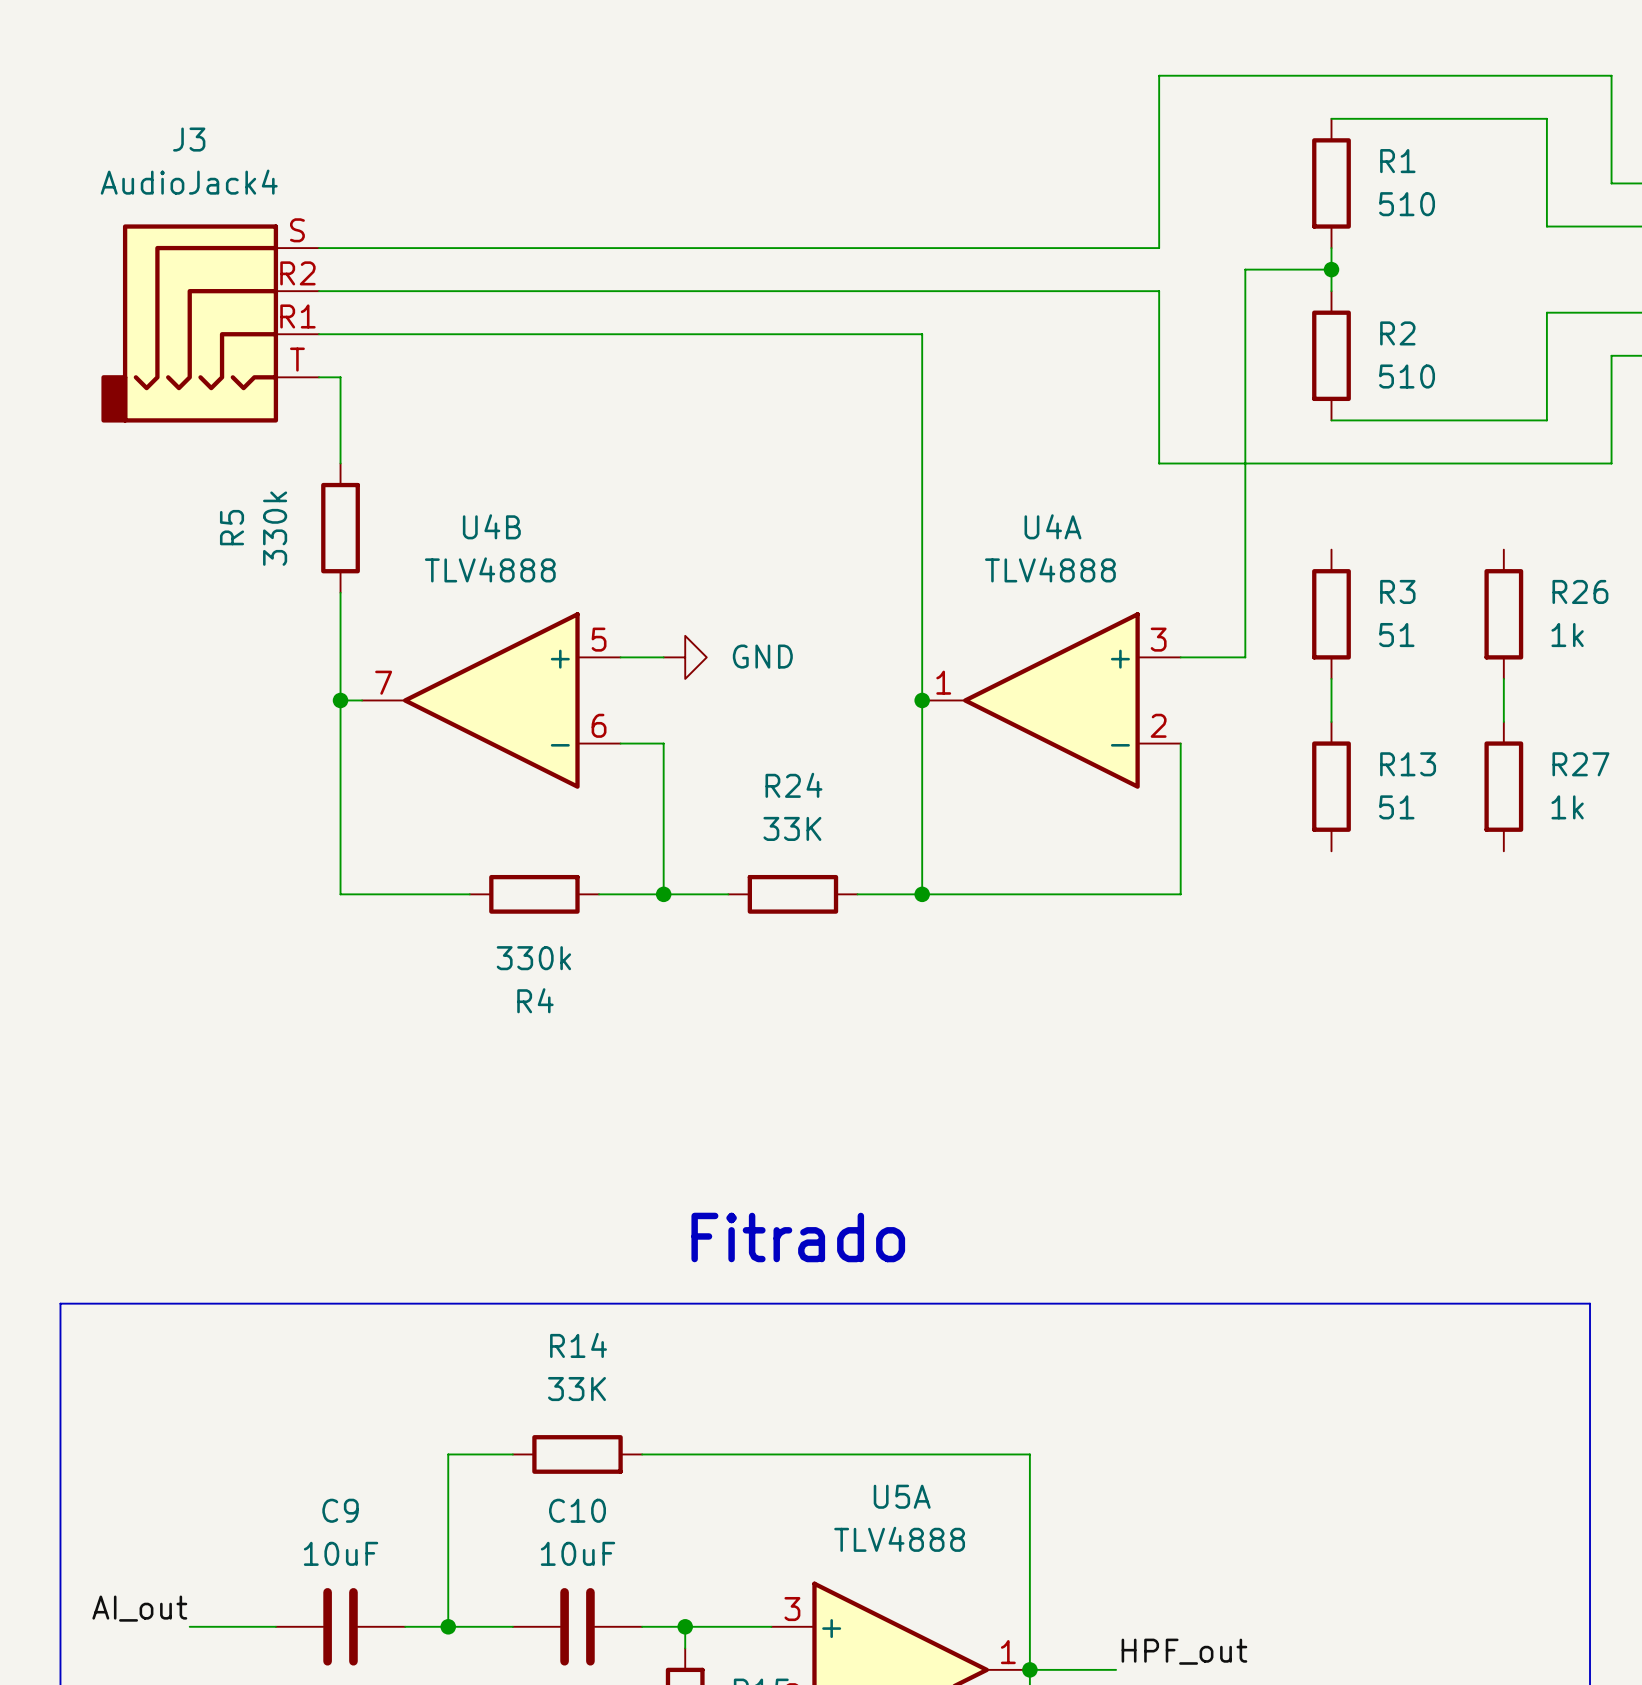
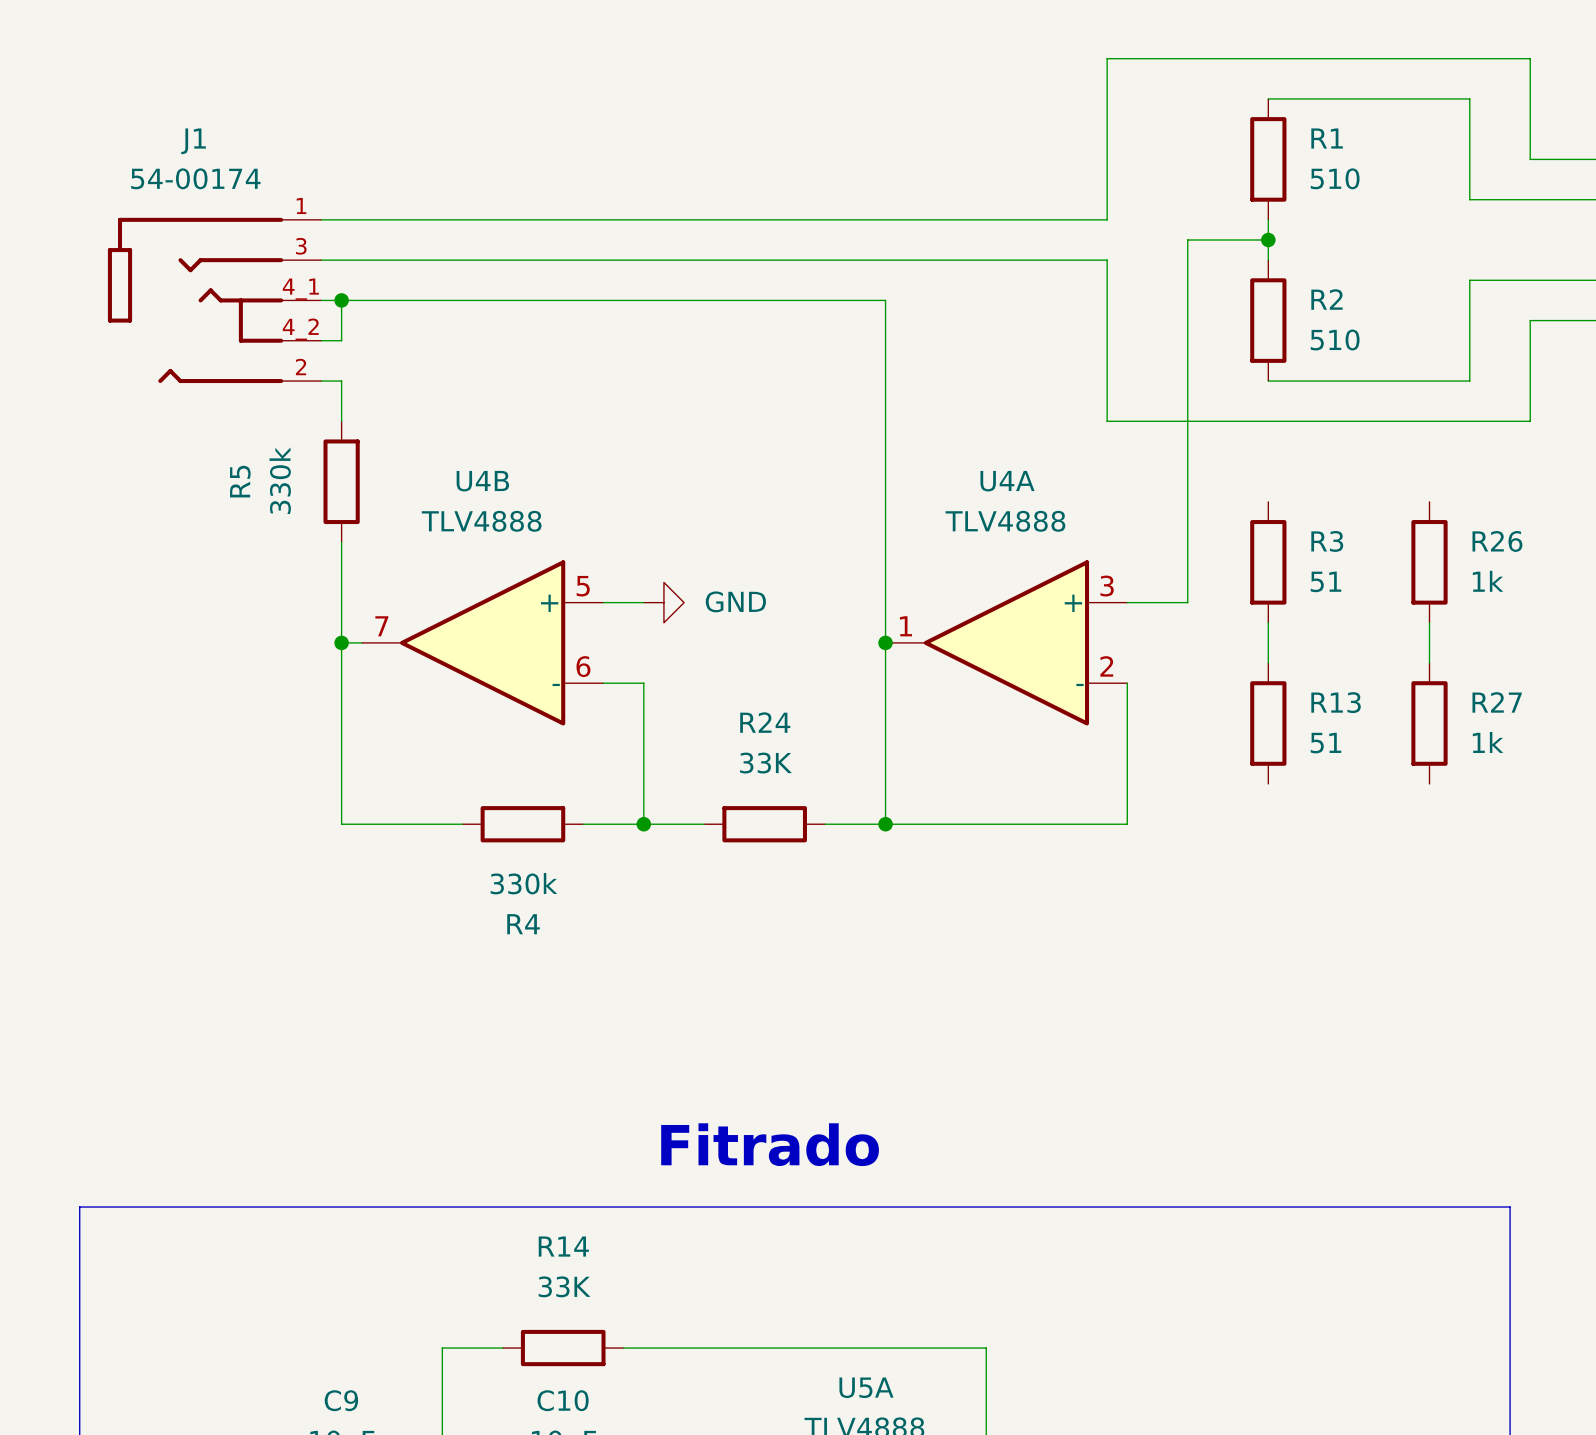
J3: AudioJack4 (210, 323) -> none
J1: none -> 54-00174 (214, 300)
wire: none -> (341, 300) (341, 340)
junction: none -> (341, 300)
wire: (340, 377) (340, 420) -> (321, 381) (341, 381)

